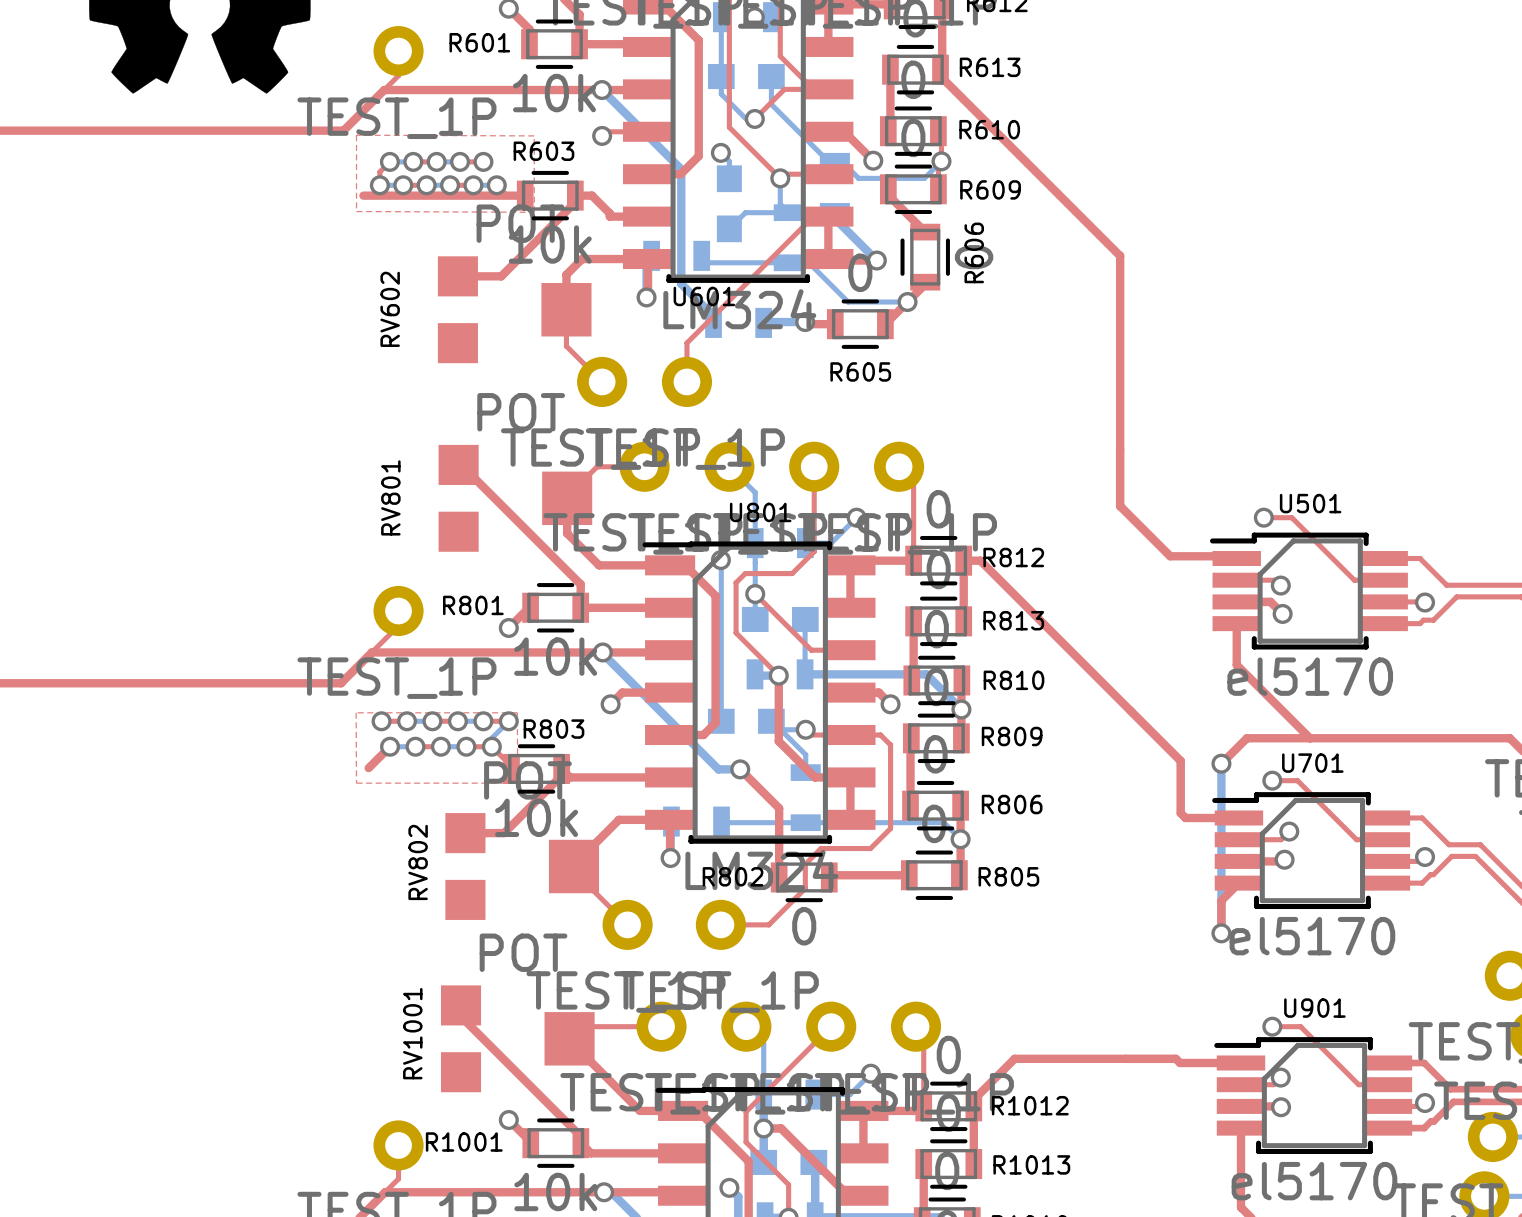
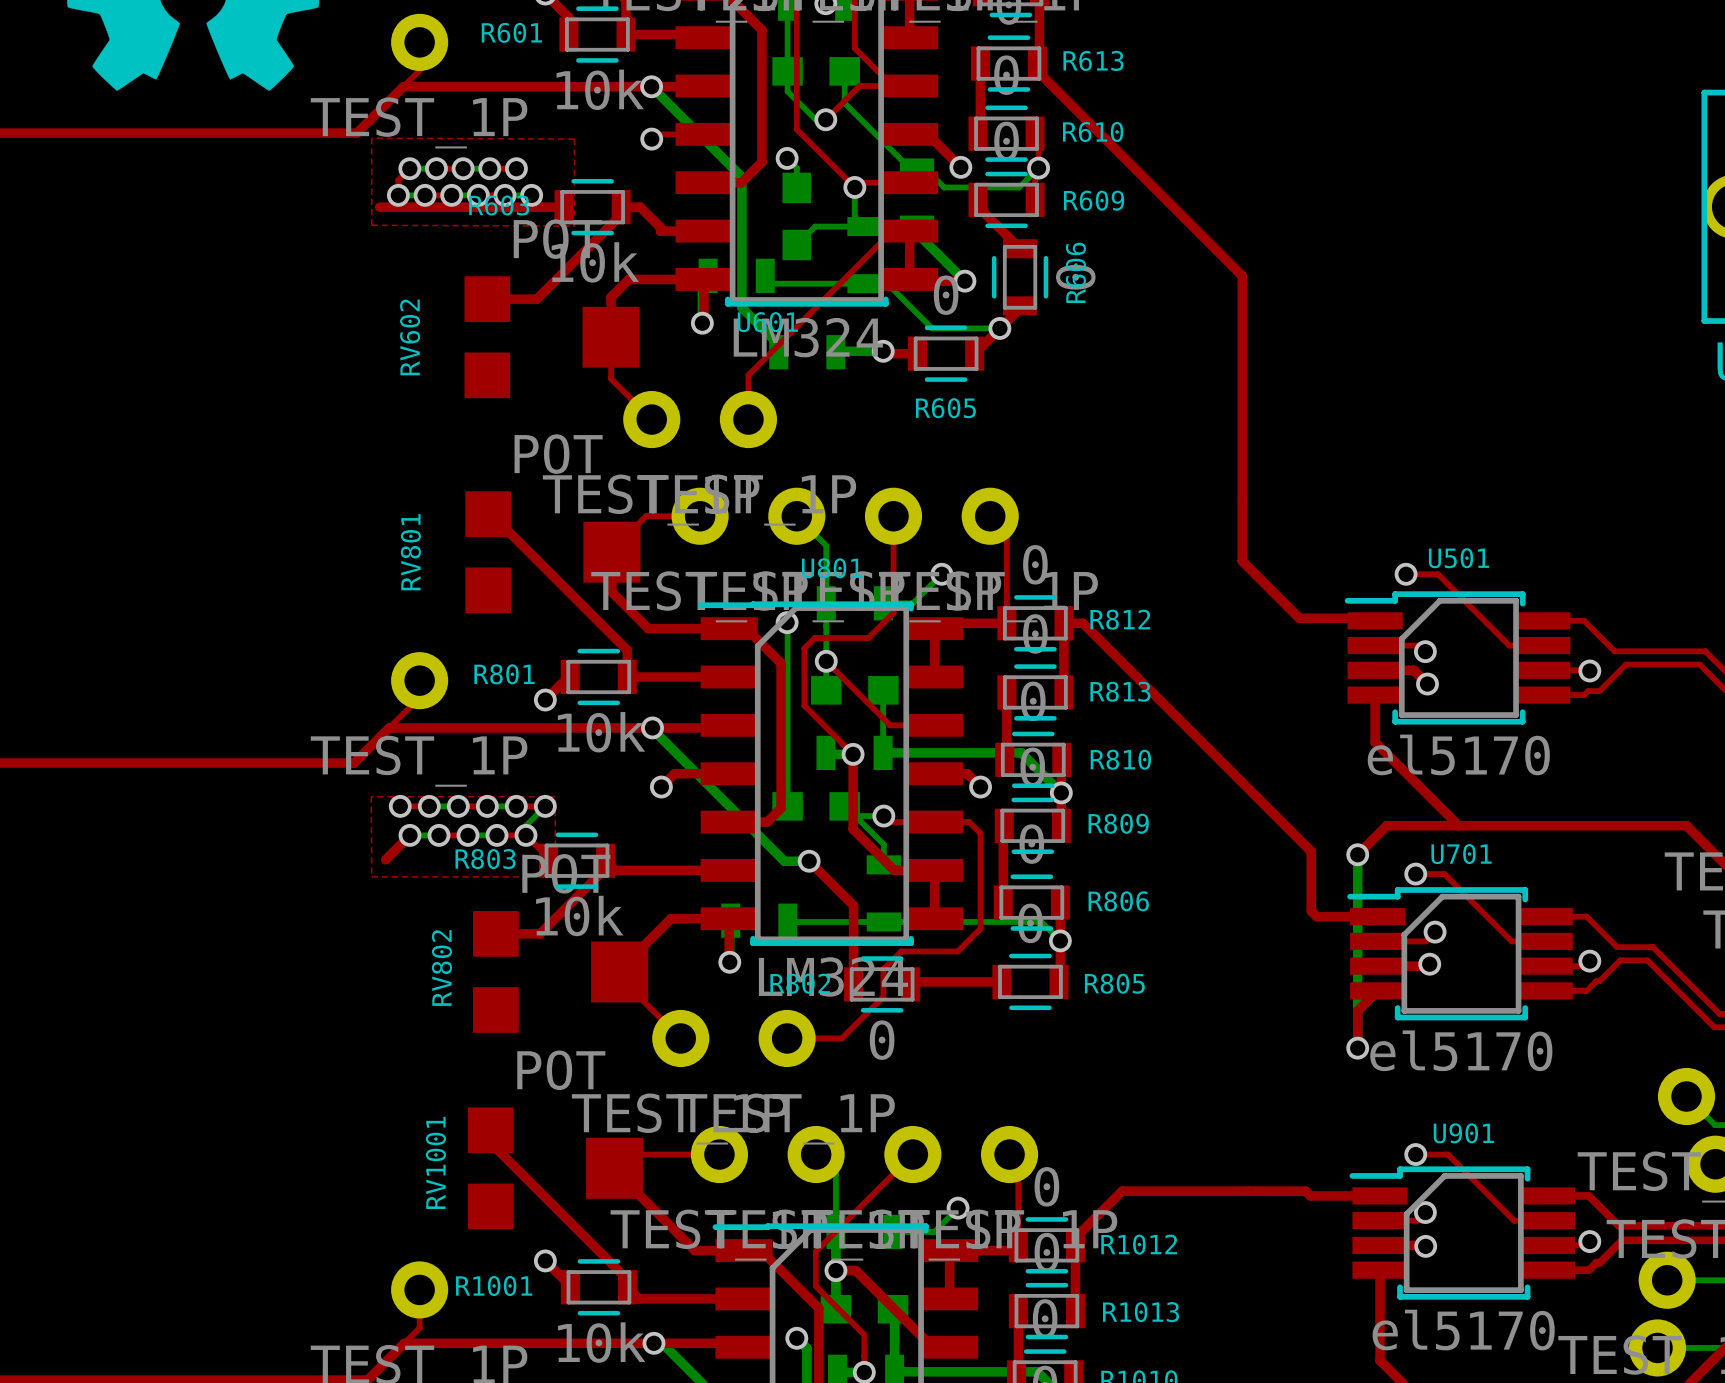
R603 name position: R603 (543, 151) -> R603 (499, 205)
R803 name position: R803 (553, 729) -> R803 (485, 859)

